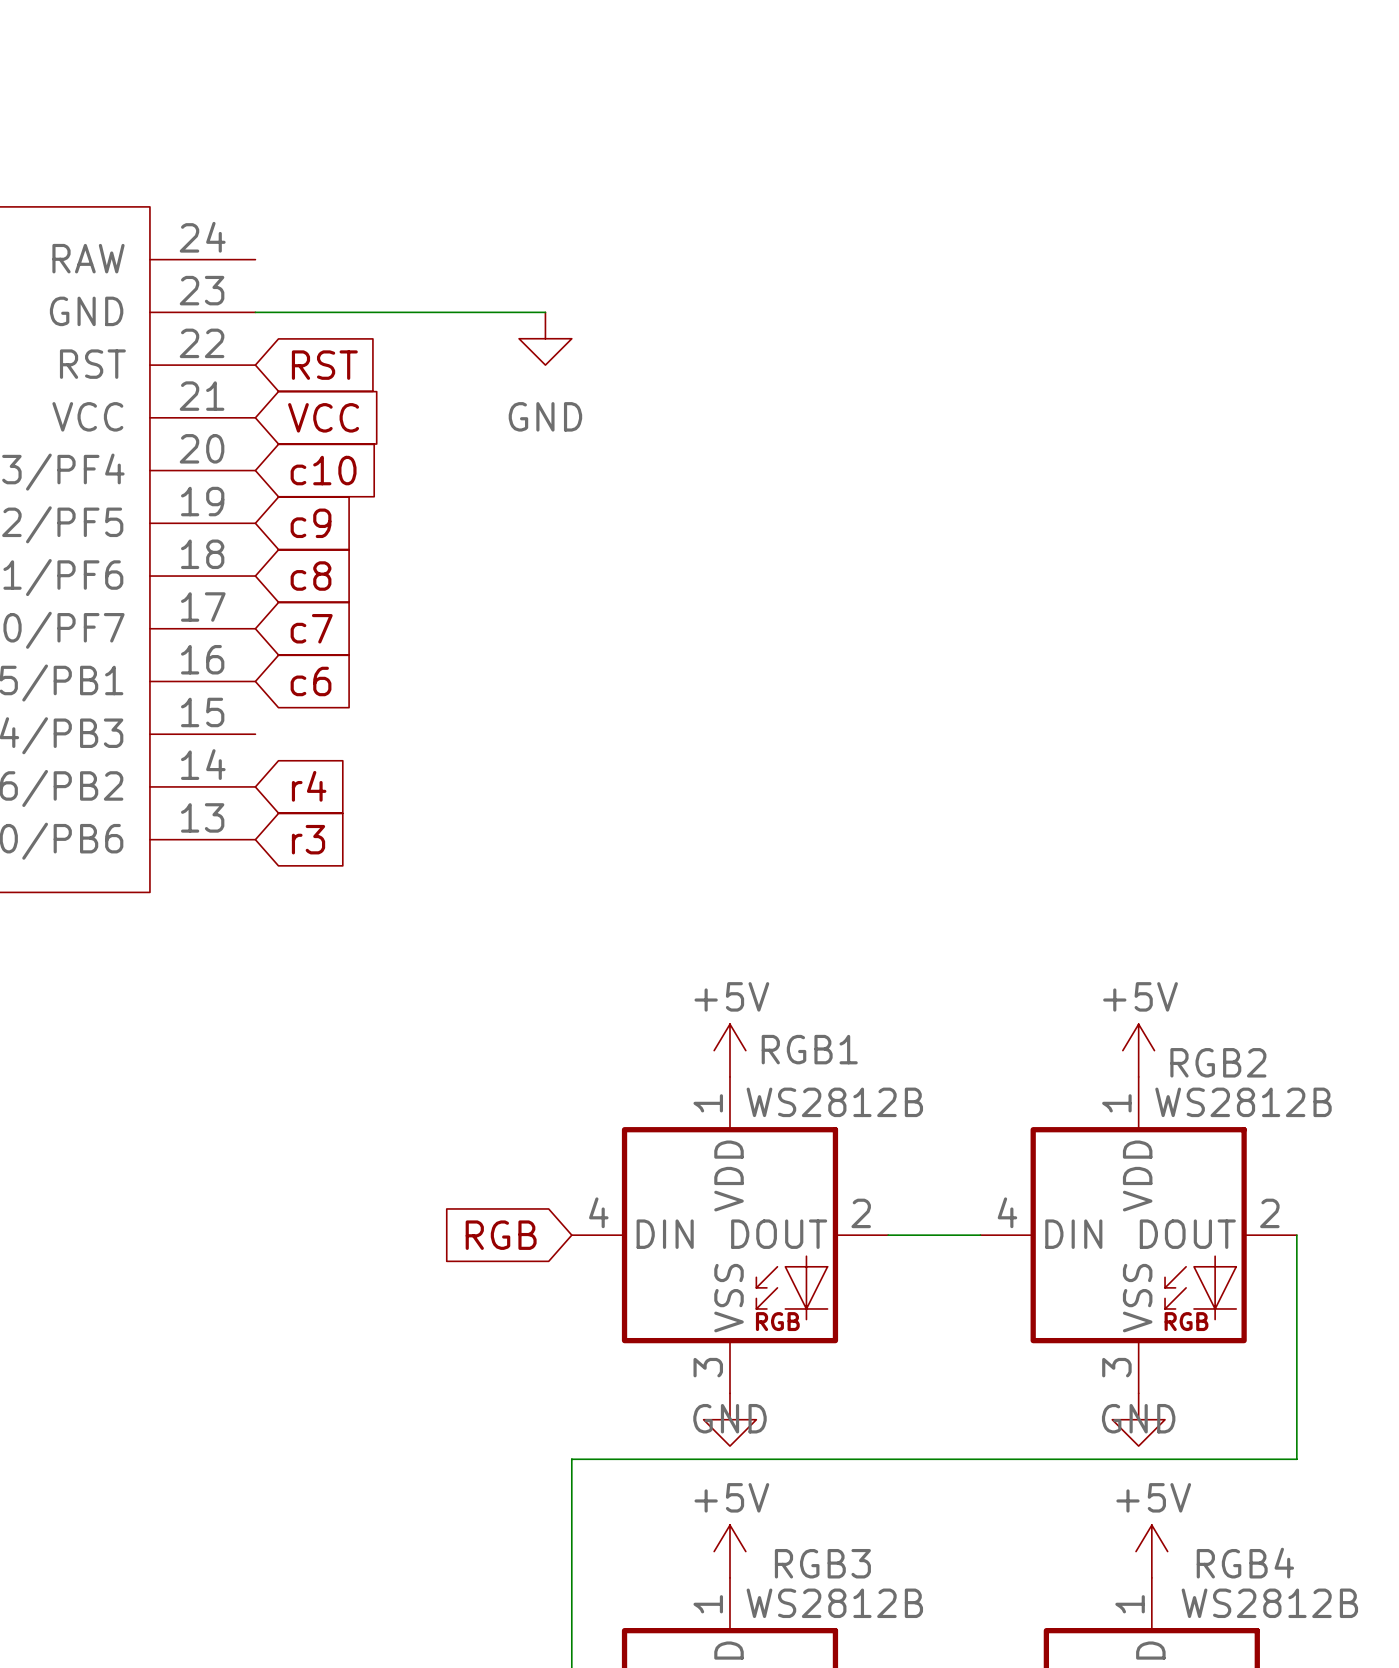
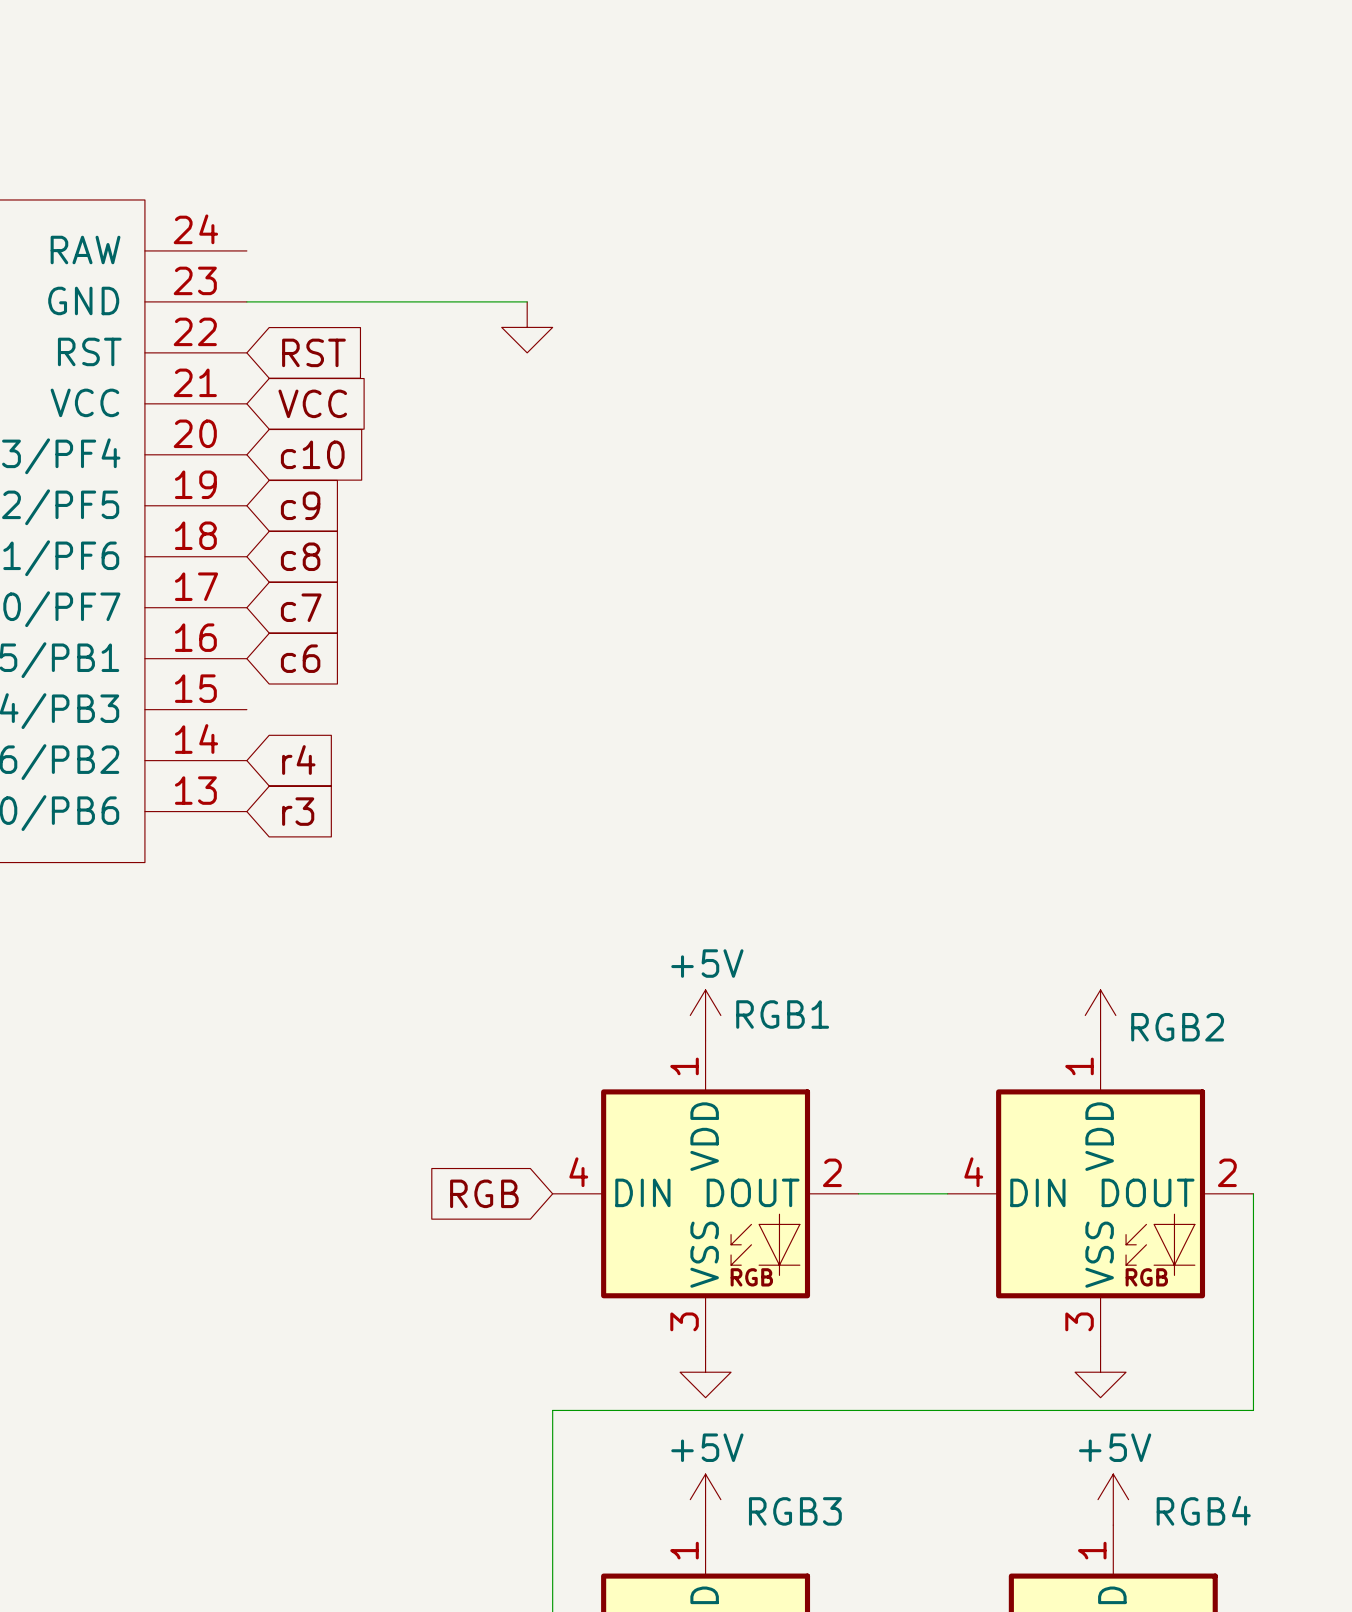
power symbol text: GND (545, 416) -> none
power symbol text: +5V (1140, 996) -> none
RGB1 value: WS2812B (834, 1102) -> none
RGB2 value: WS2812B (1243, 1102) -> none
power symbol text: GND (729, 1418) -> none
power symbol text: GND (1138, 1418) -> none
RGB3 value: WS2812B (834, 1603) -> none
RGB4 value: WS2812B (1269, 1603) -> none

